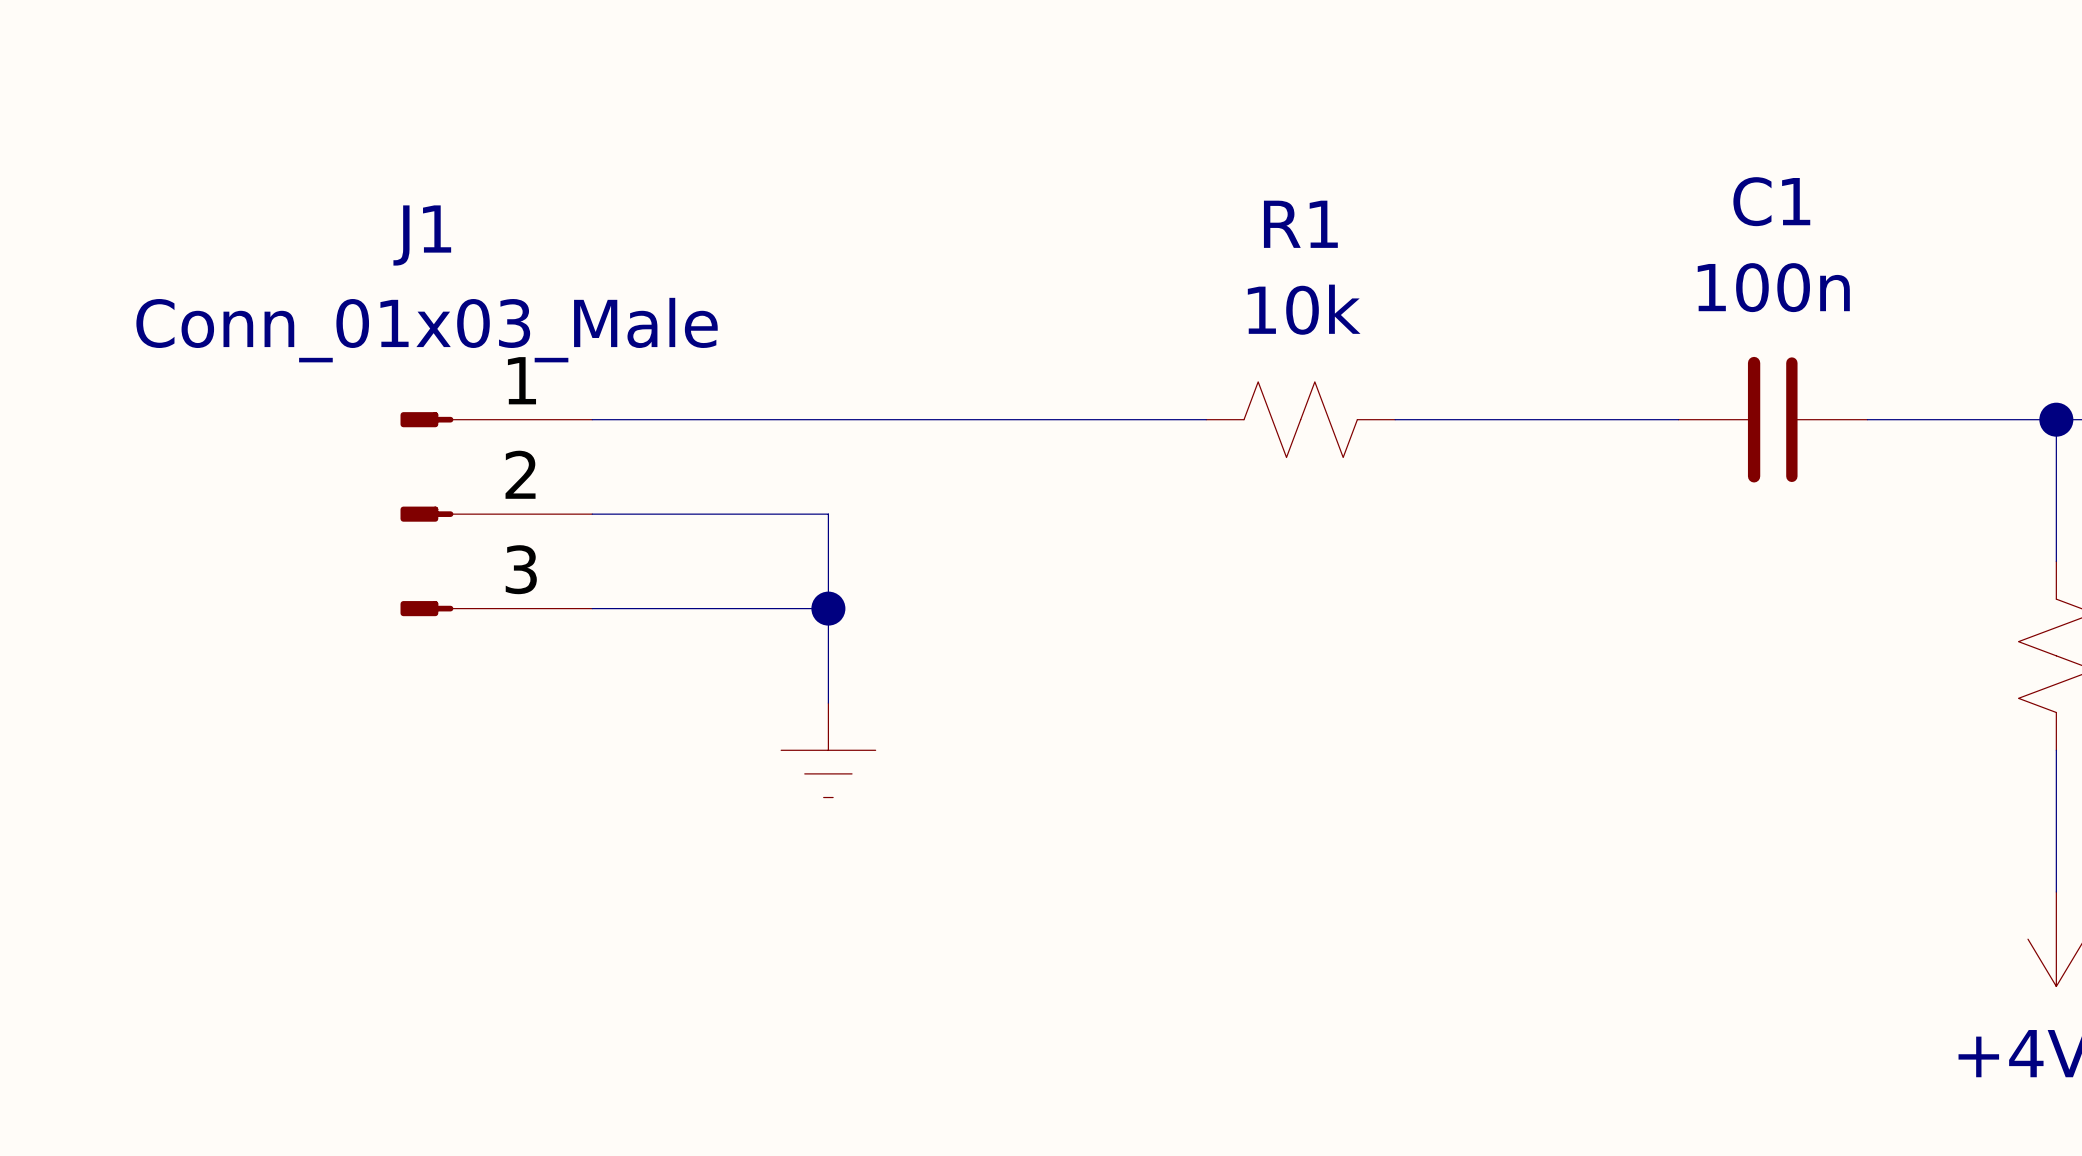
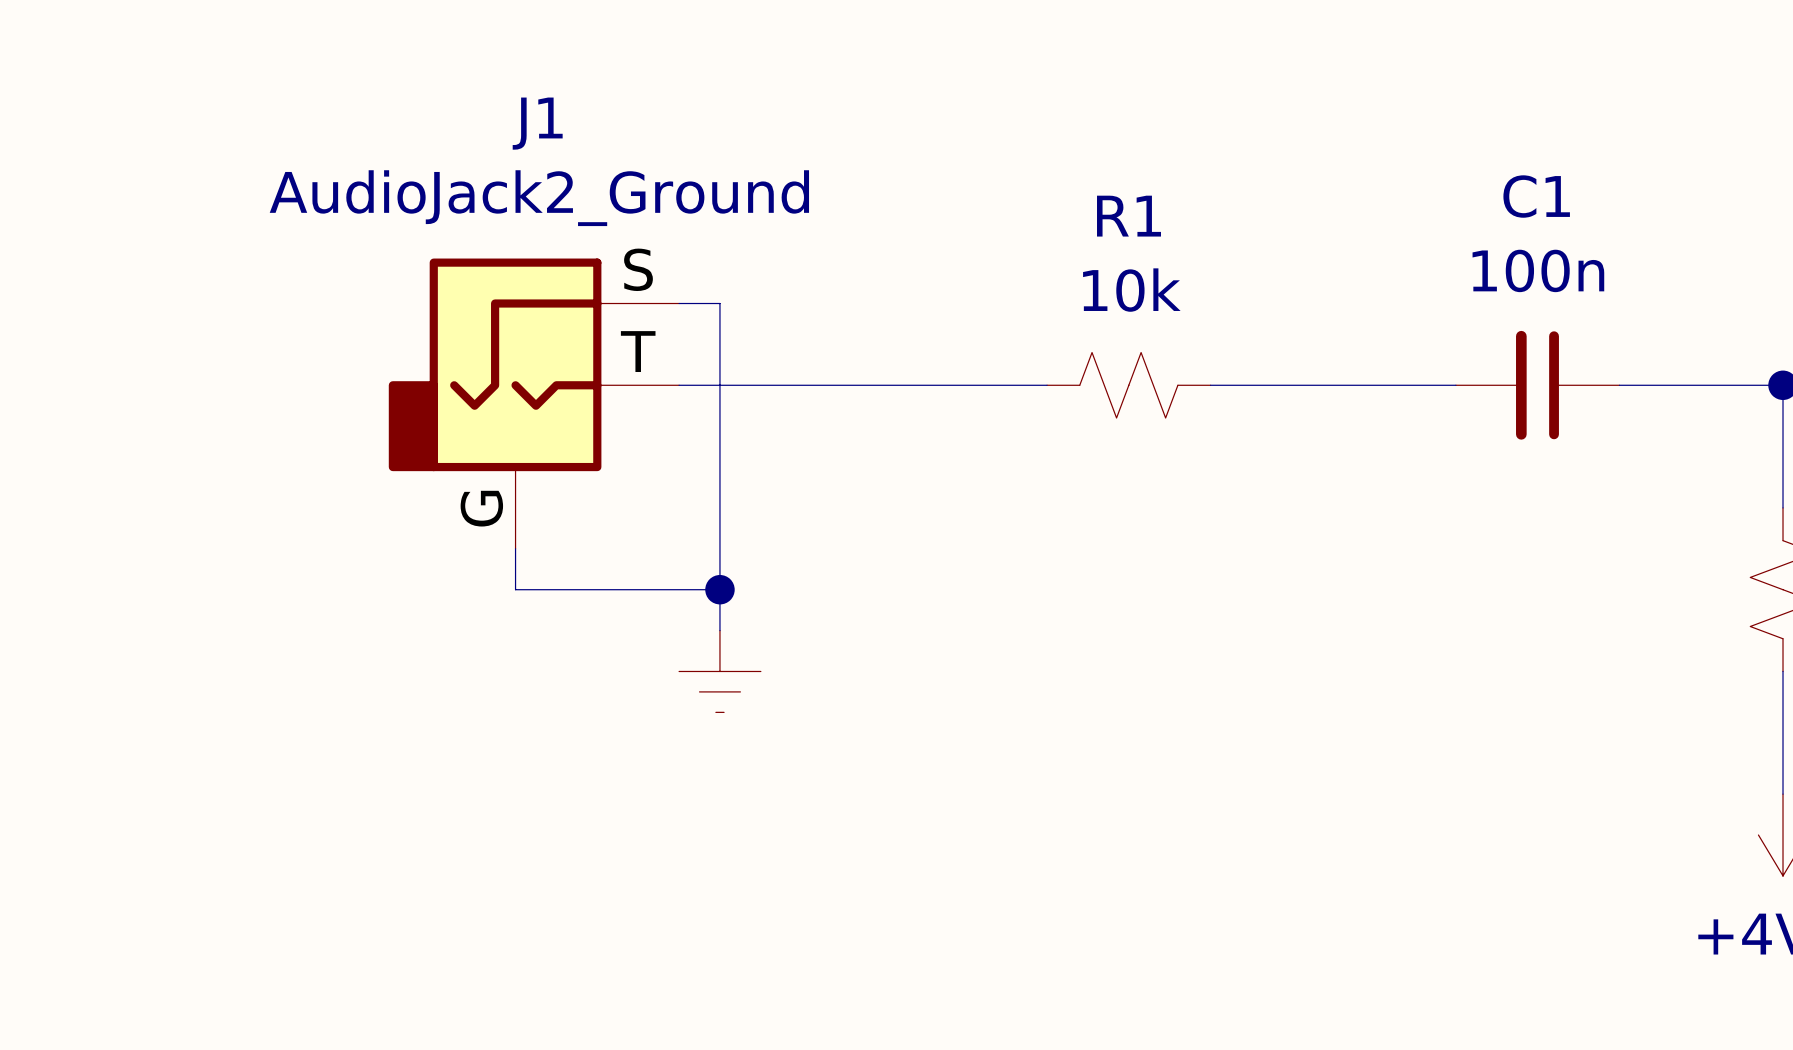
J1 name position: J1 (422, 235) -> J1 (537, 123)
J1 value: Conn_01x03_Male (427, 330) -> AudioJack2_Ground (539, 198)
J1 symbol: [400, 412, 593, 617] -> [388, 258, 680, 549]
wire: (592, 514) (828, 514) -> (679, 303) (719, 303) (719, 467)
wire: (592, 608) (828, 608) -> (515, 548) (515, 589) (719, 589)
junction position: (828, 608) -> (719, 589)

